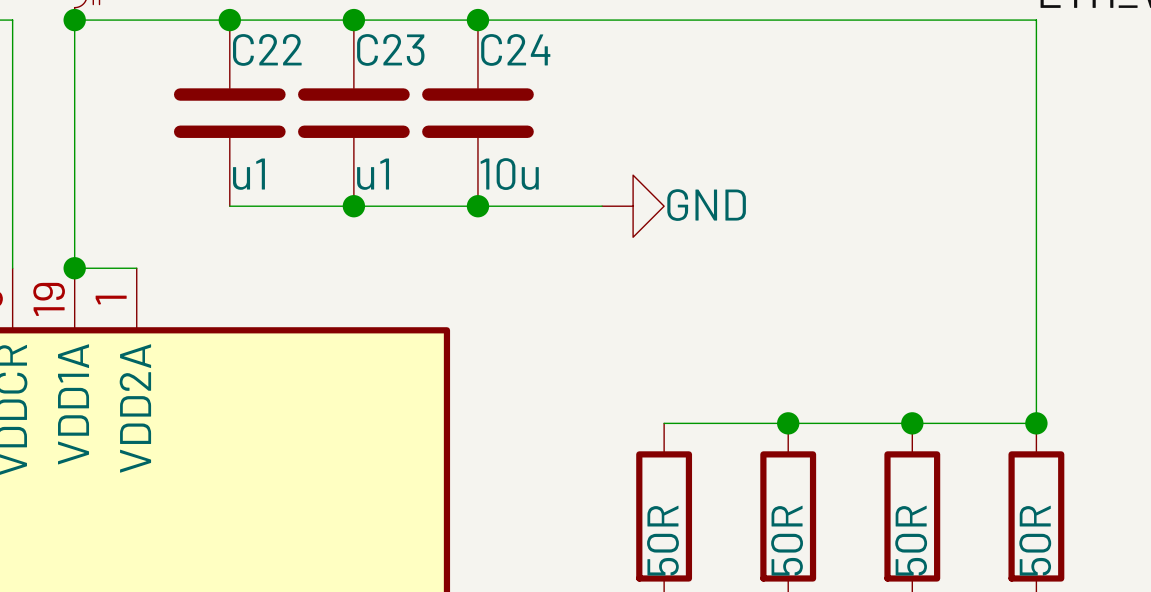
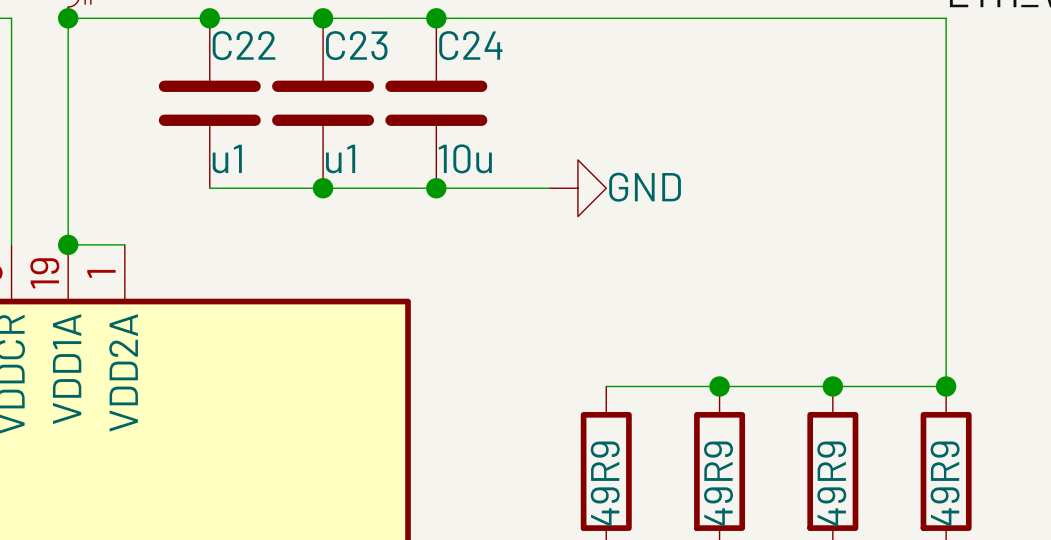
part value: 50R (662, 540) -> 49R9 (605, 483)
part value: 50R (787, 540) -> 49R9 (718, 483)
part value: 50R (911, 540) -> 49R9 (831, 483)
part value: 50R (1035, 540) -> 49R9 (945, 483)

